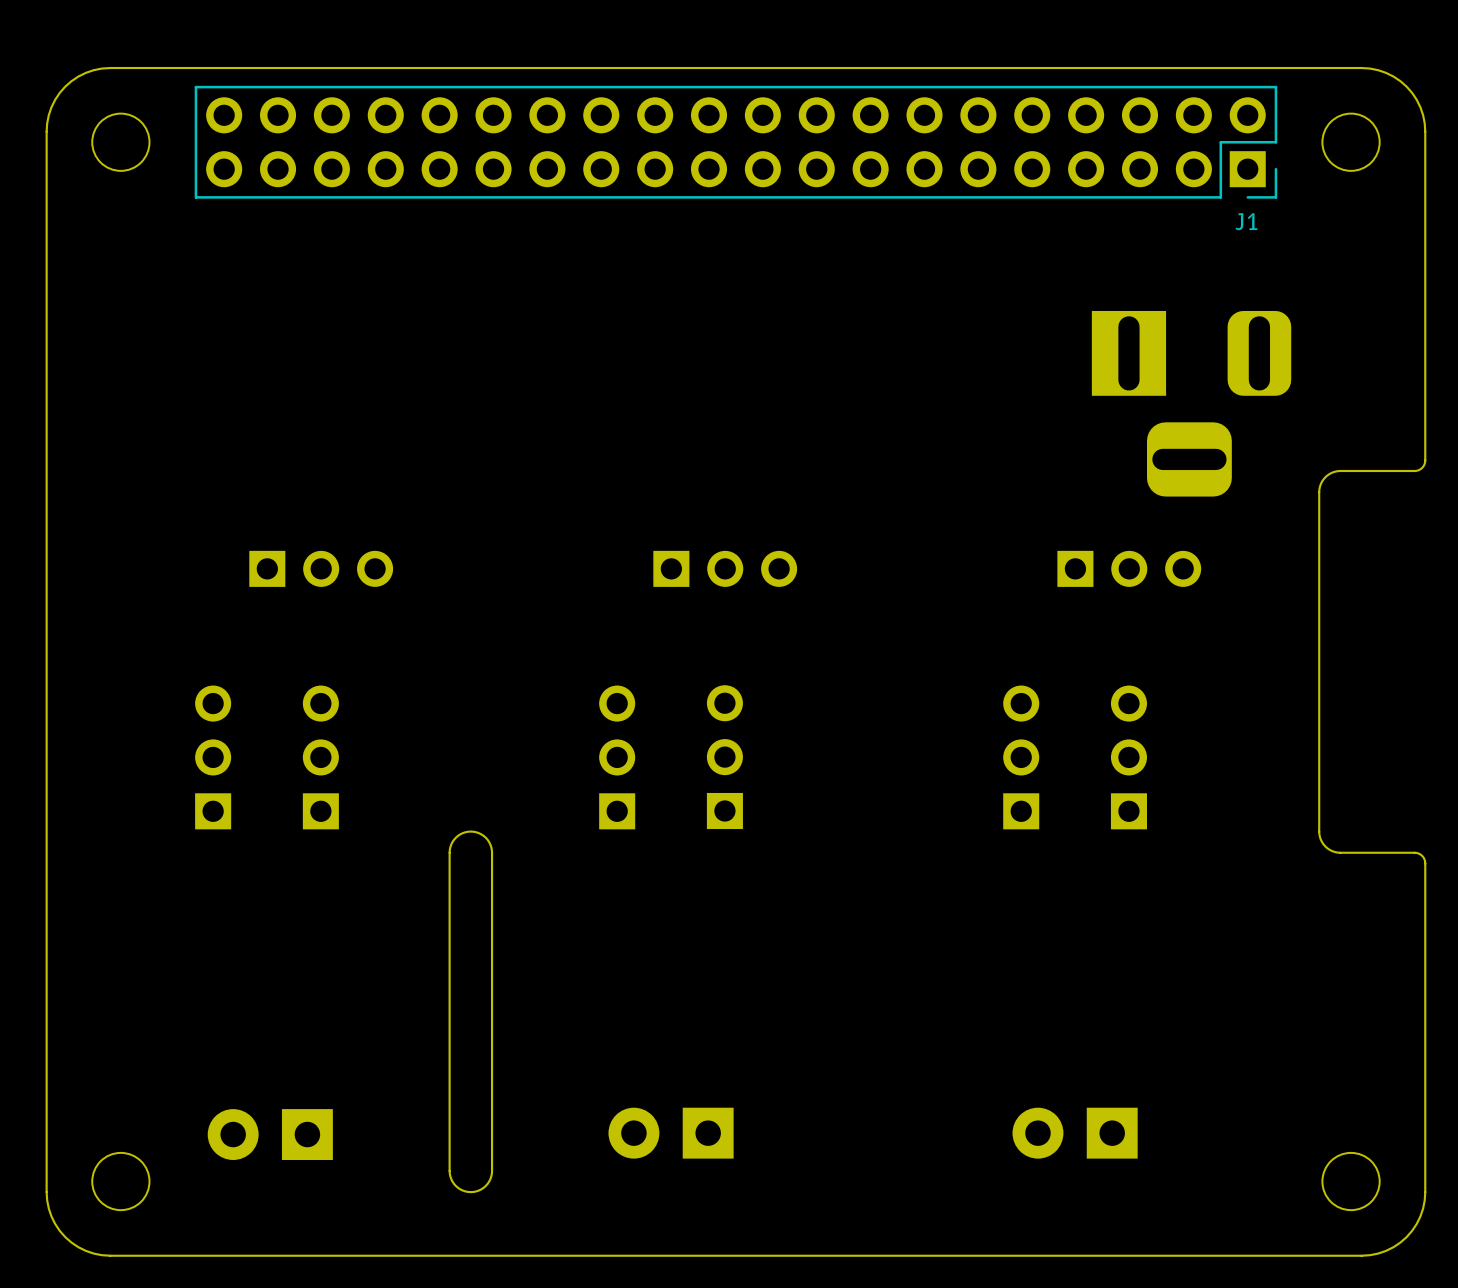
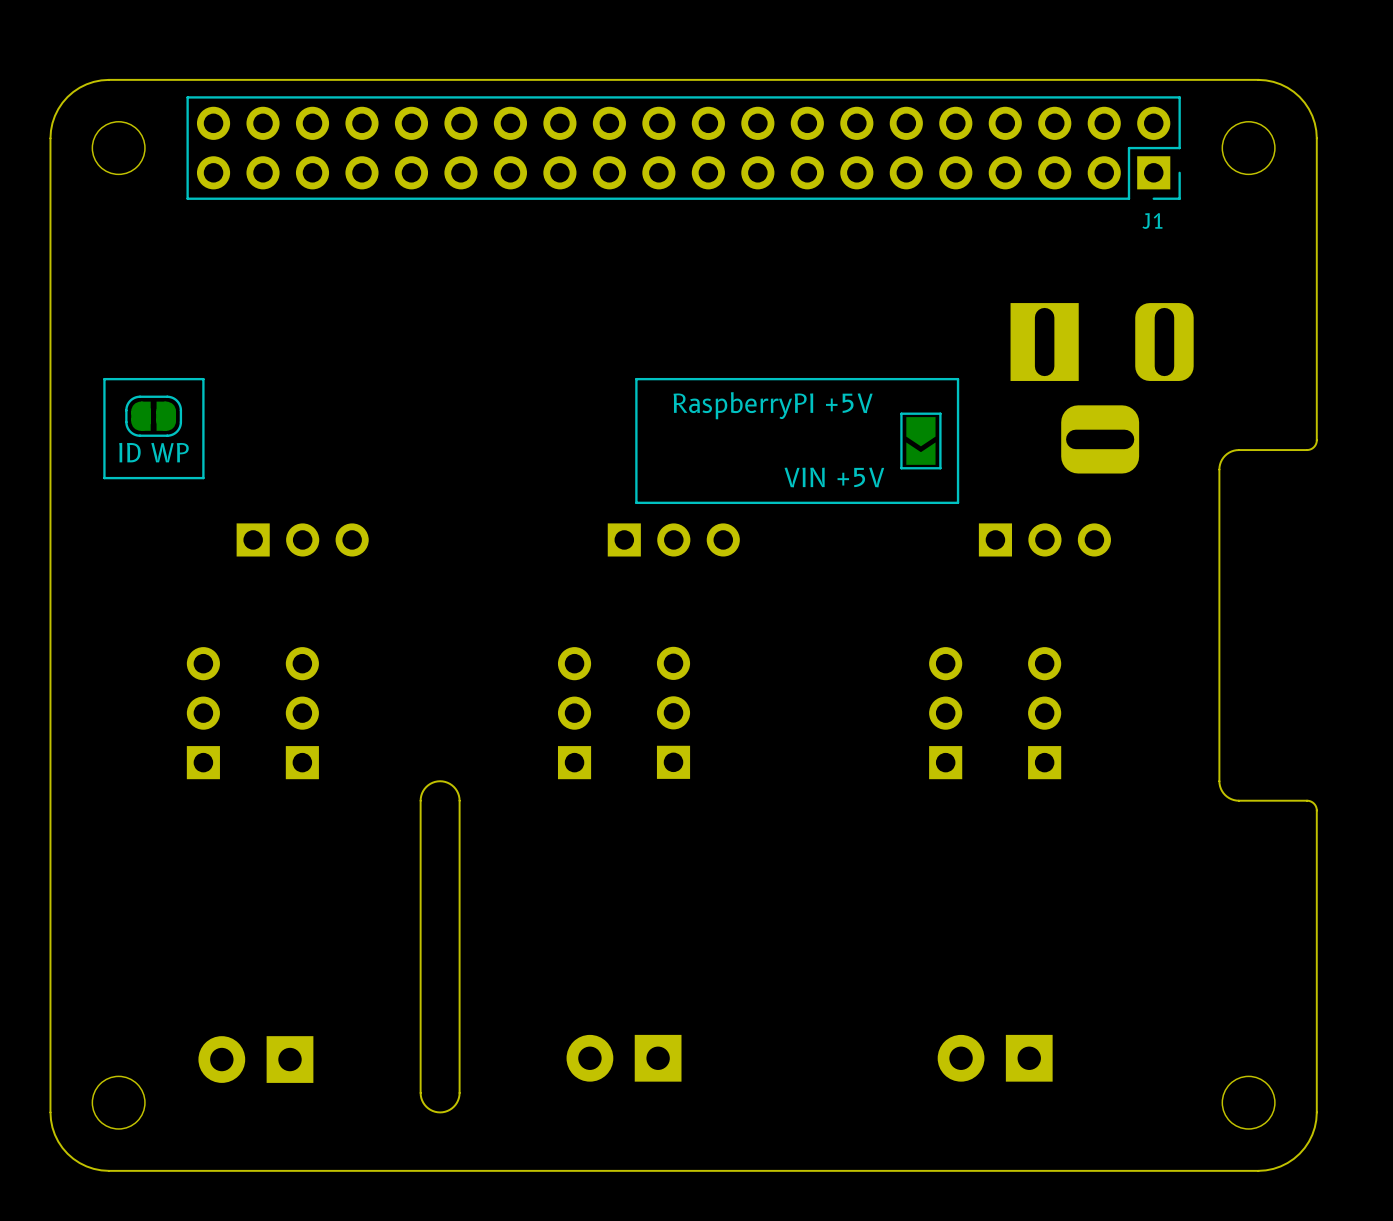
line: none -> (203, 379) (104, 379) (104, 478) (203, 478) (203, 379)
line: none -> (958, 379) (636, 379) (636, 502) (958, 502) (958, 379)
part: none -> (153, 416)
part: none -> (920, 440)

